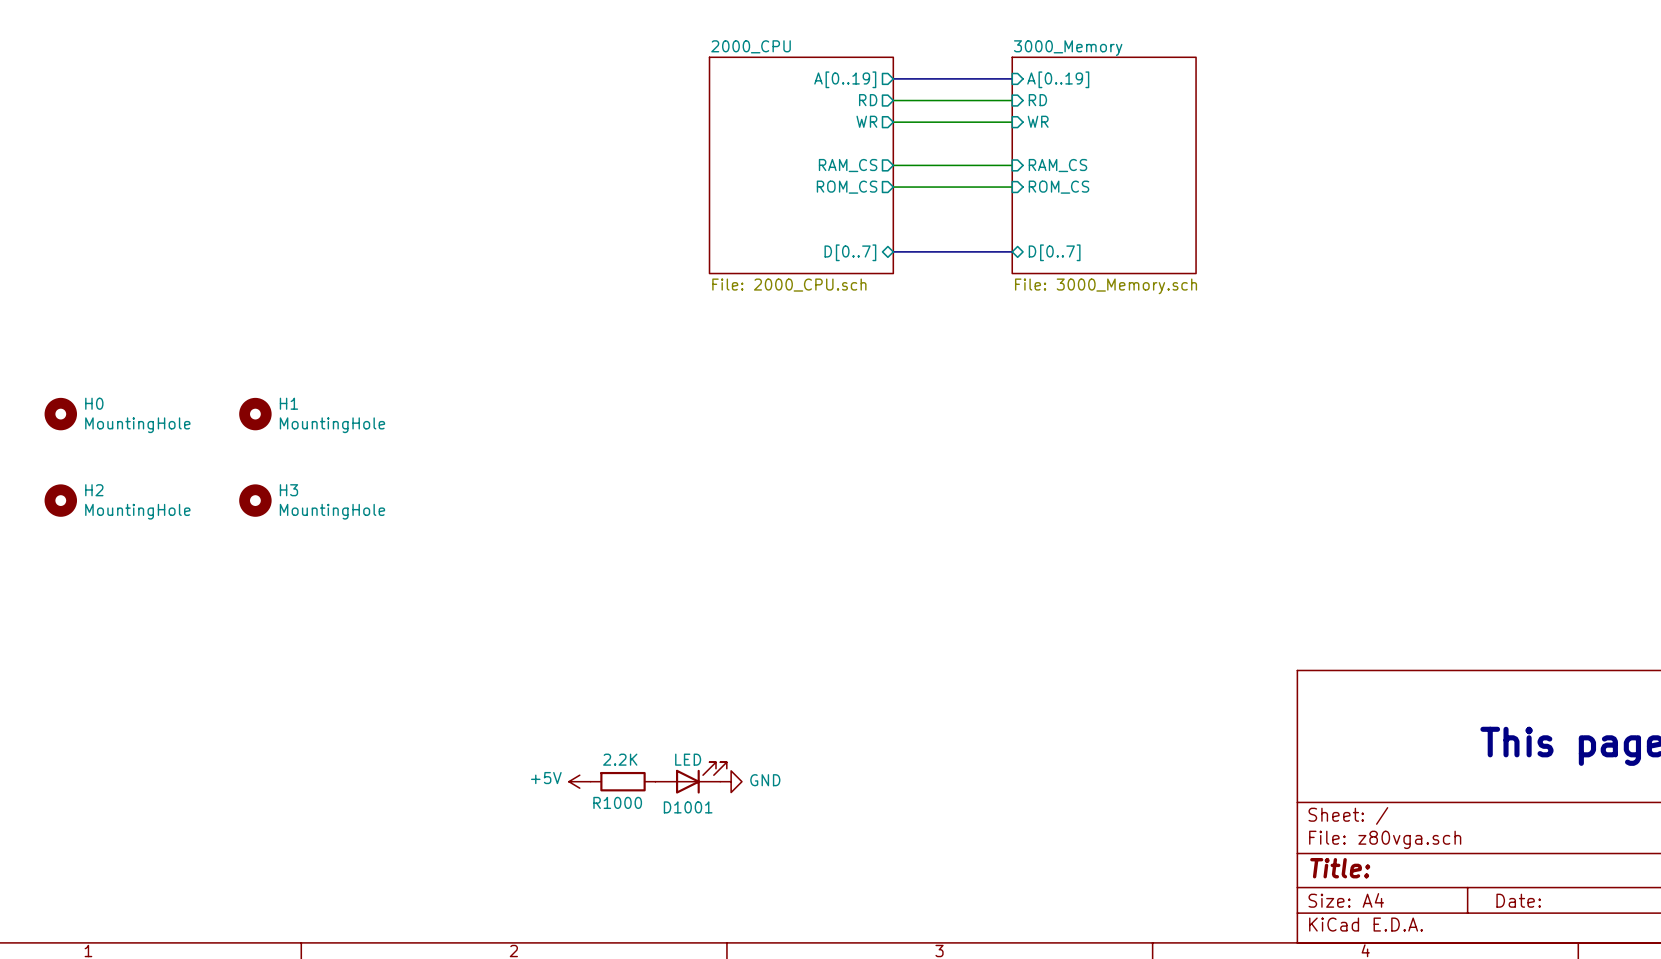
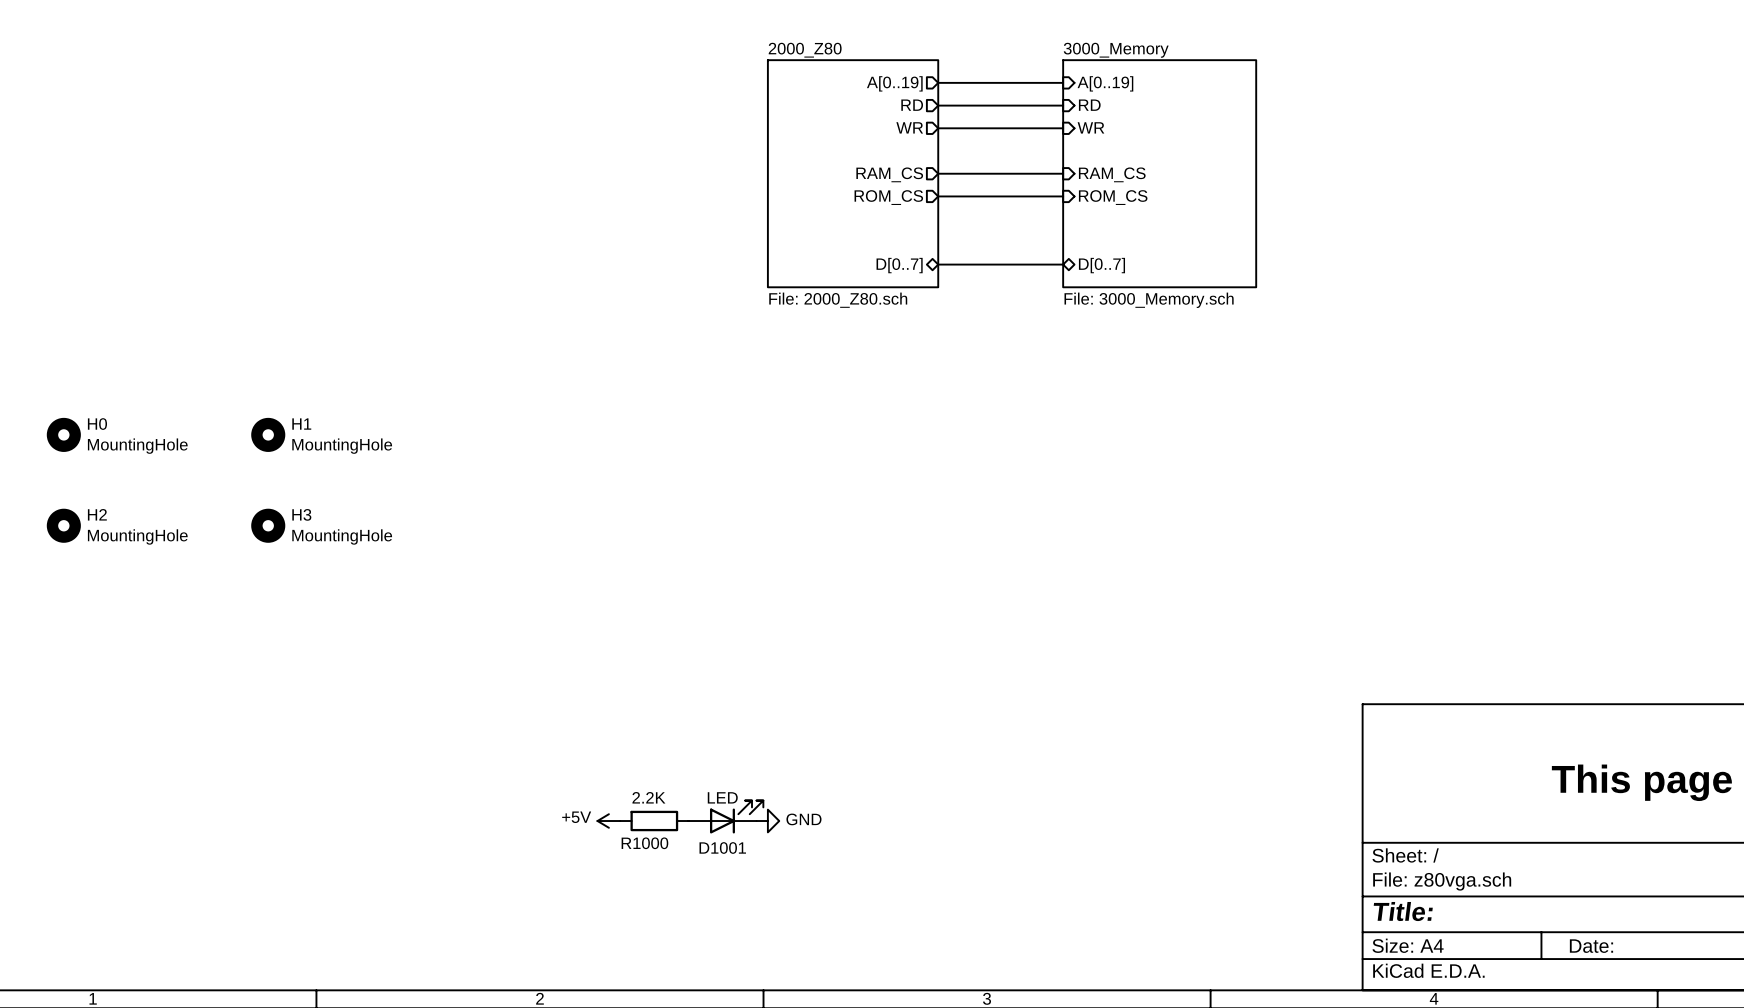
sheet 2000_CPU: File: 2000_CPU.sch (801, 165) -> none
sheet 2000_Z80: none -> File: 2000_Z80.sch (853, 173)

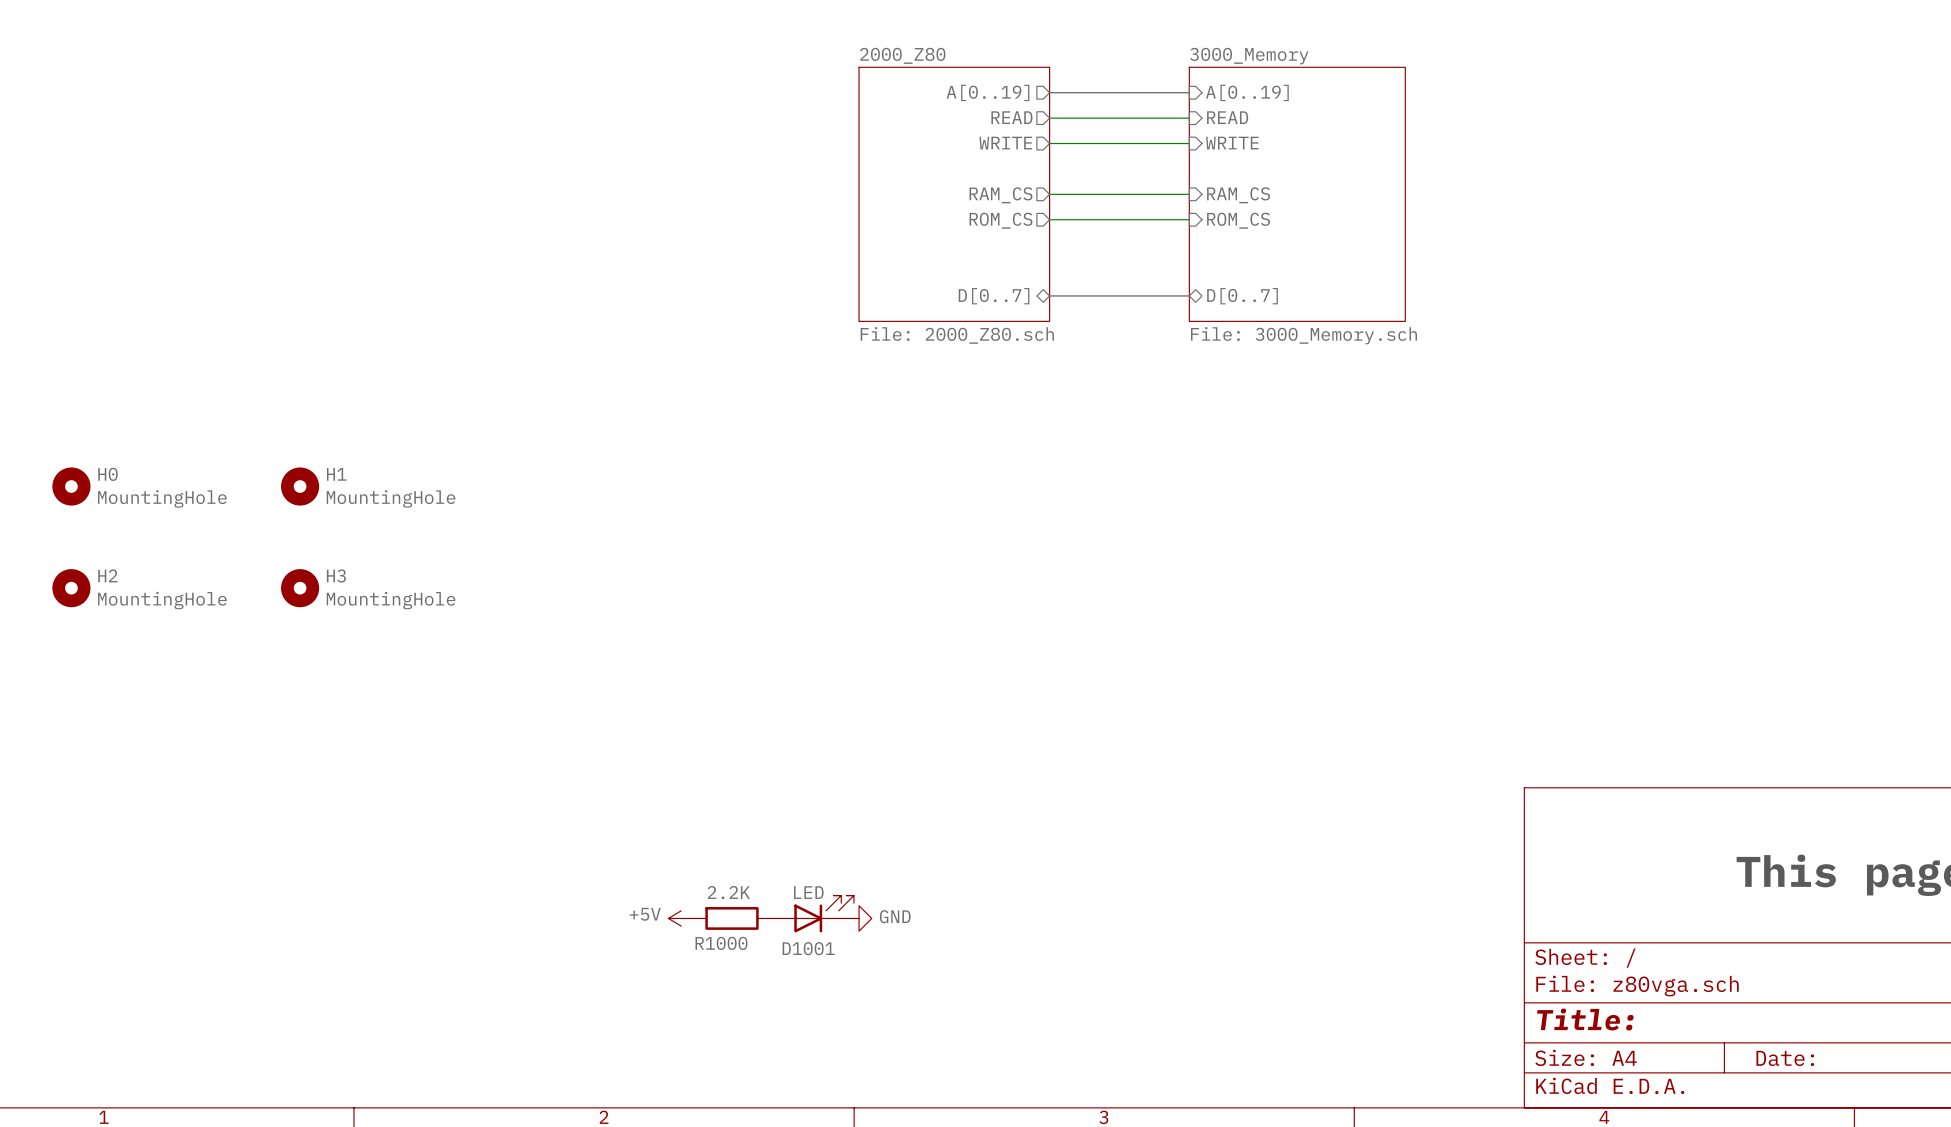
sheet pin: RD (912, 105) -> READ (1011, 117)
sheet pin: RD (1089, 105) -> READ (1227, 117)
sheet pin: WR (909, 127) -> WRITE (1005, 143)
sheet pin: WR (1090, 127) -> WRITE (1232, 143)

